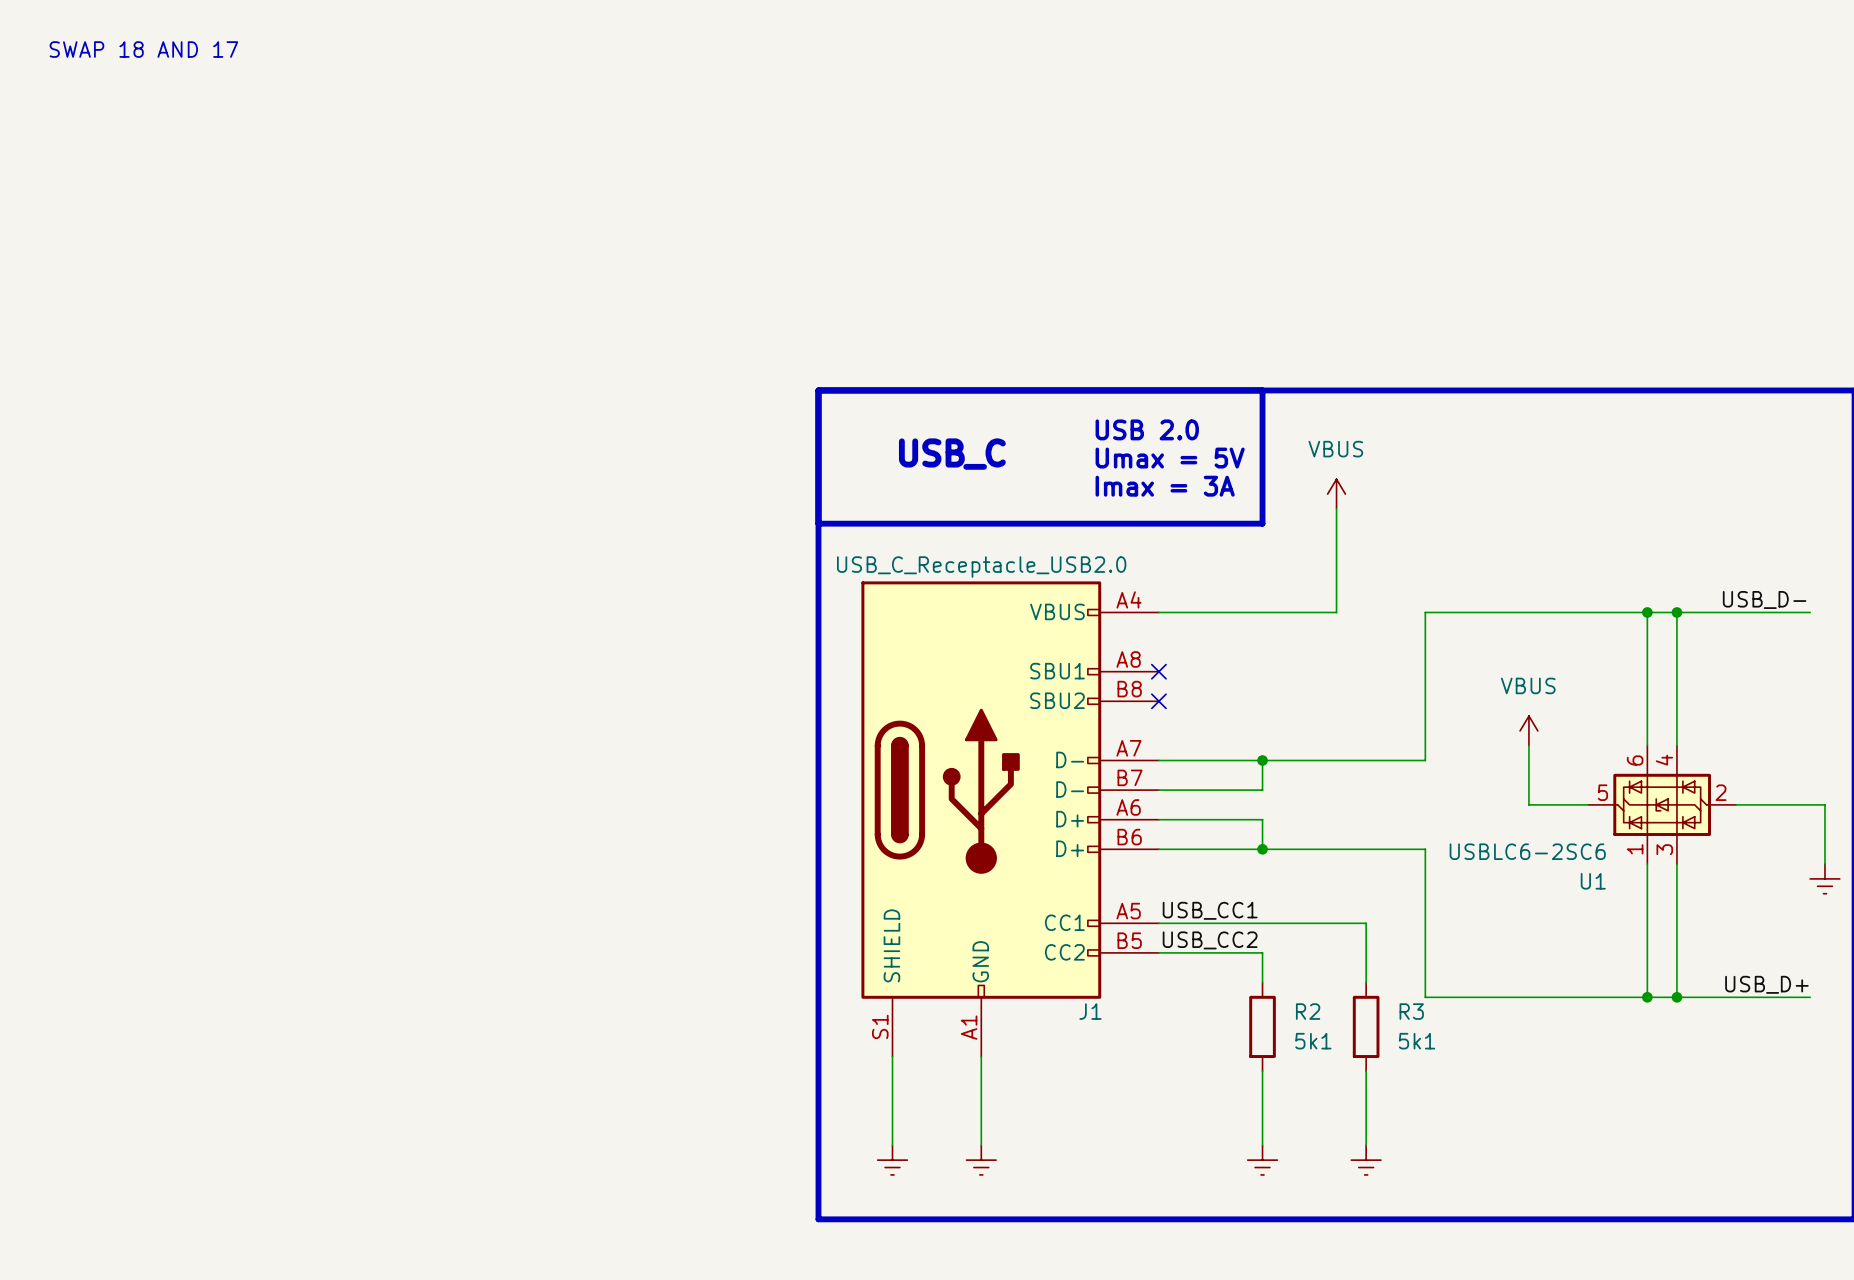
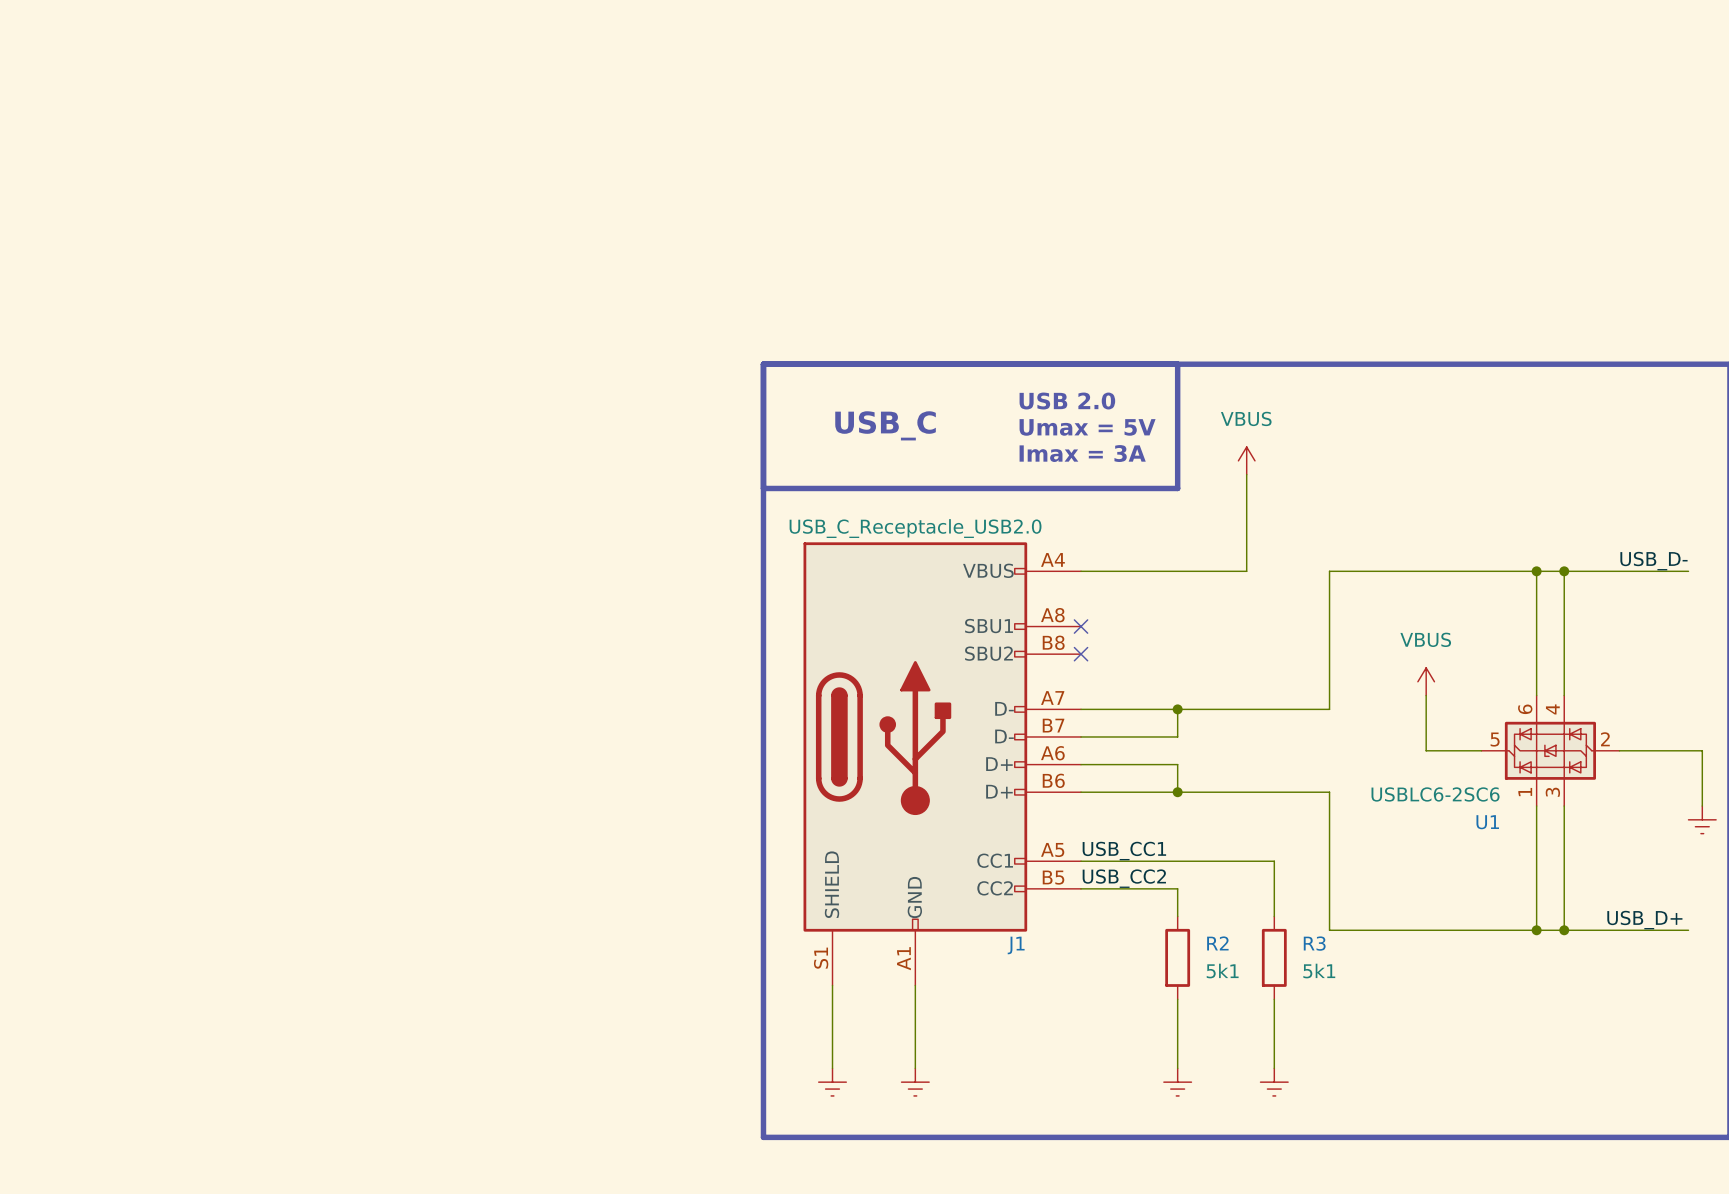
text: SWAP 18 AND 17 (143, 49) -> none

